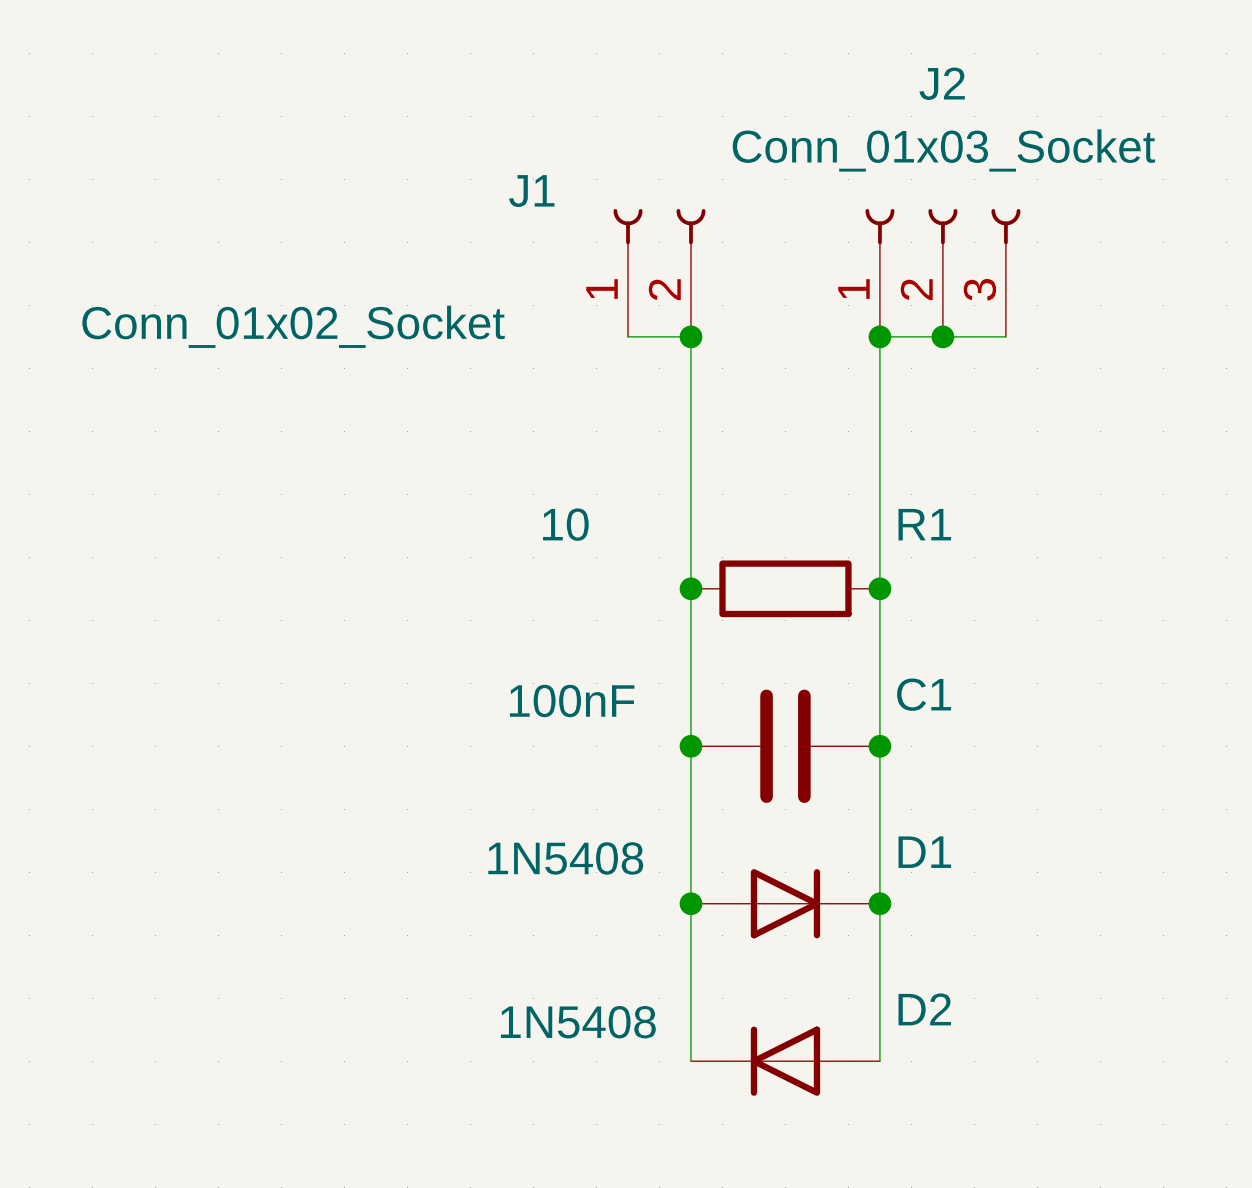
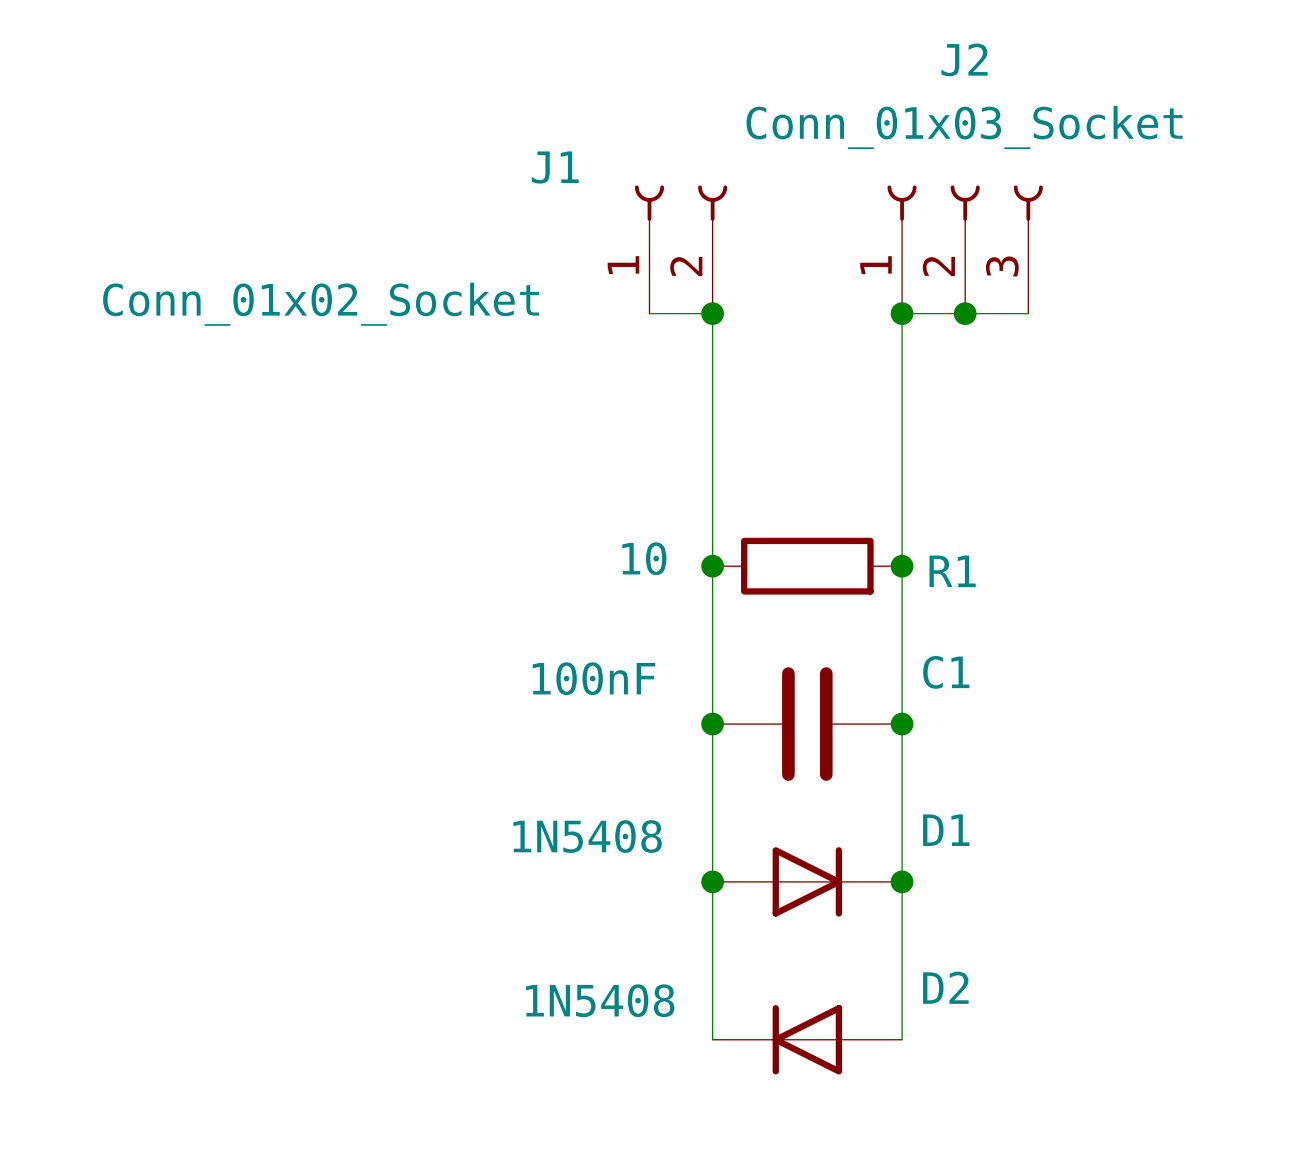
R1 value position: 10 (565, 524) -> 10 (644, 558)
R1 name position: R1 (924, 524) -> R1 (952, 571)

